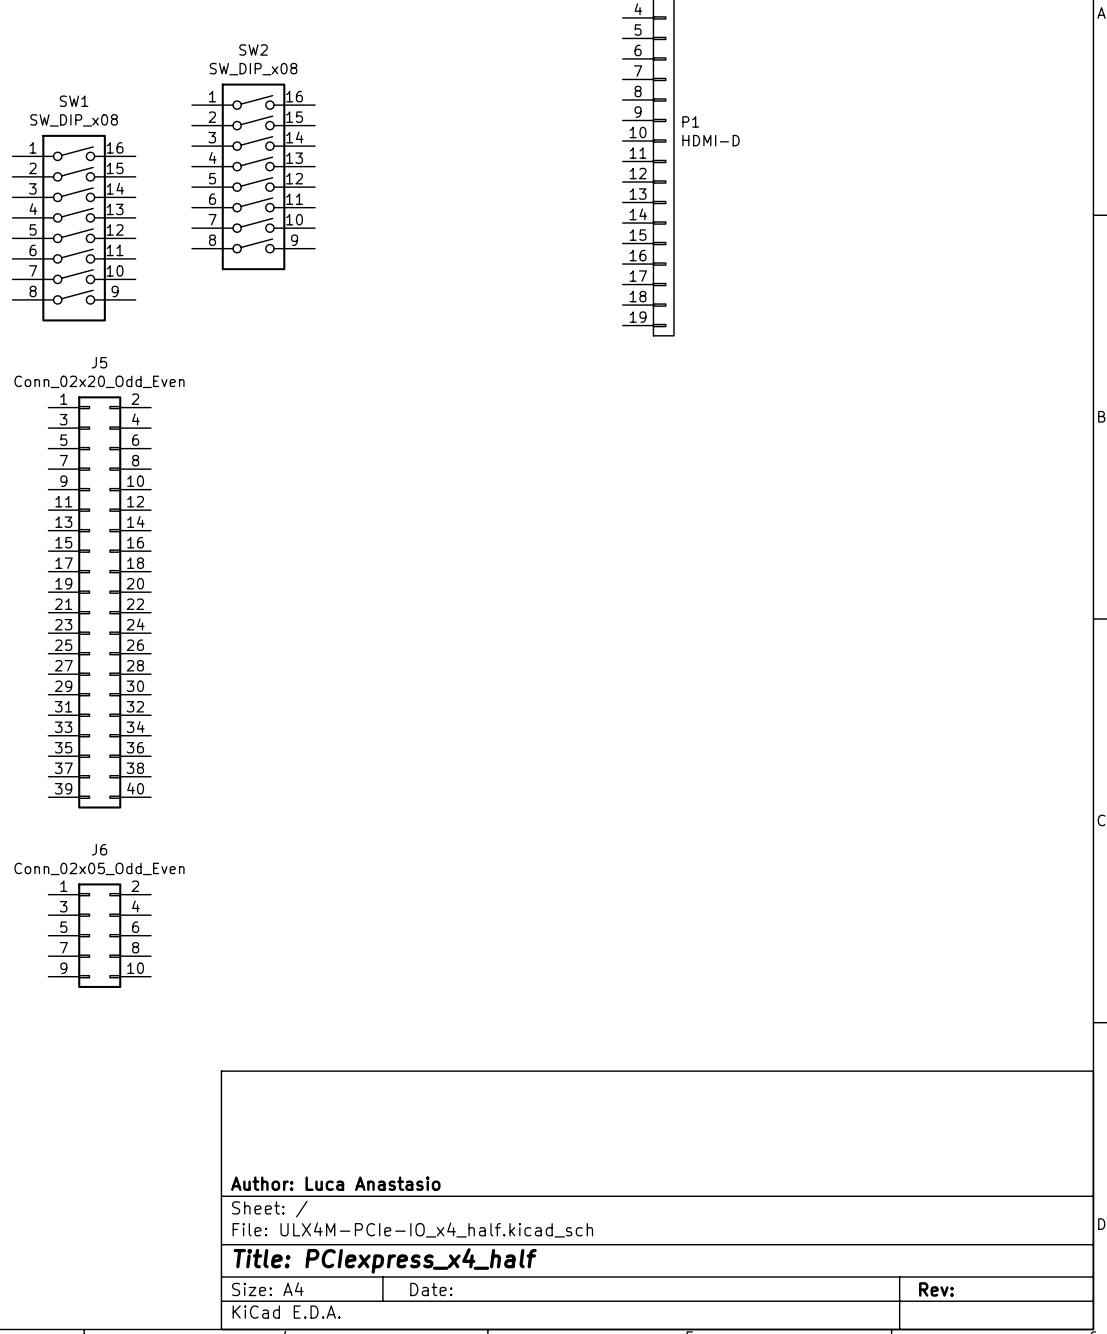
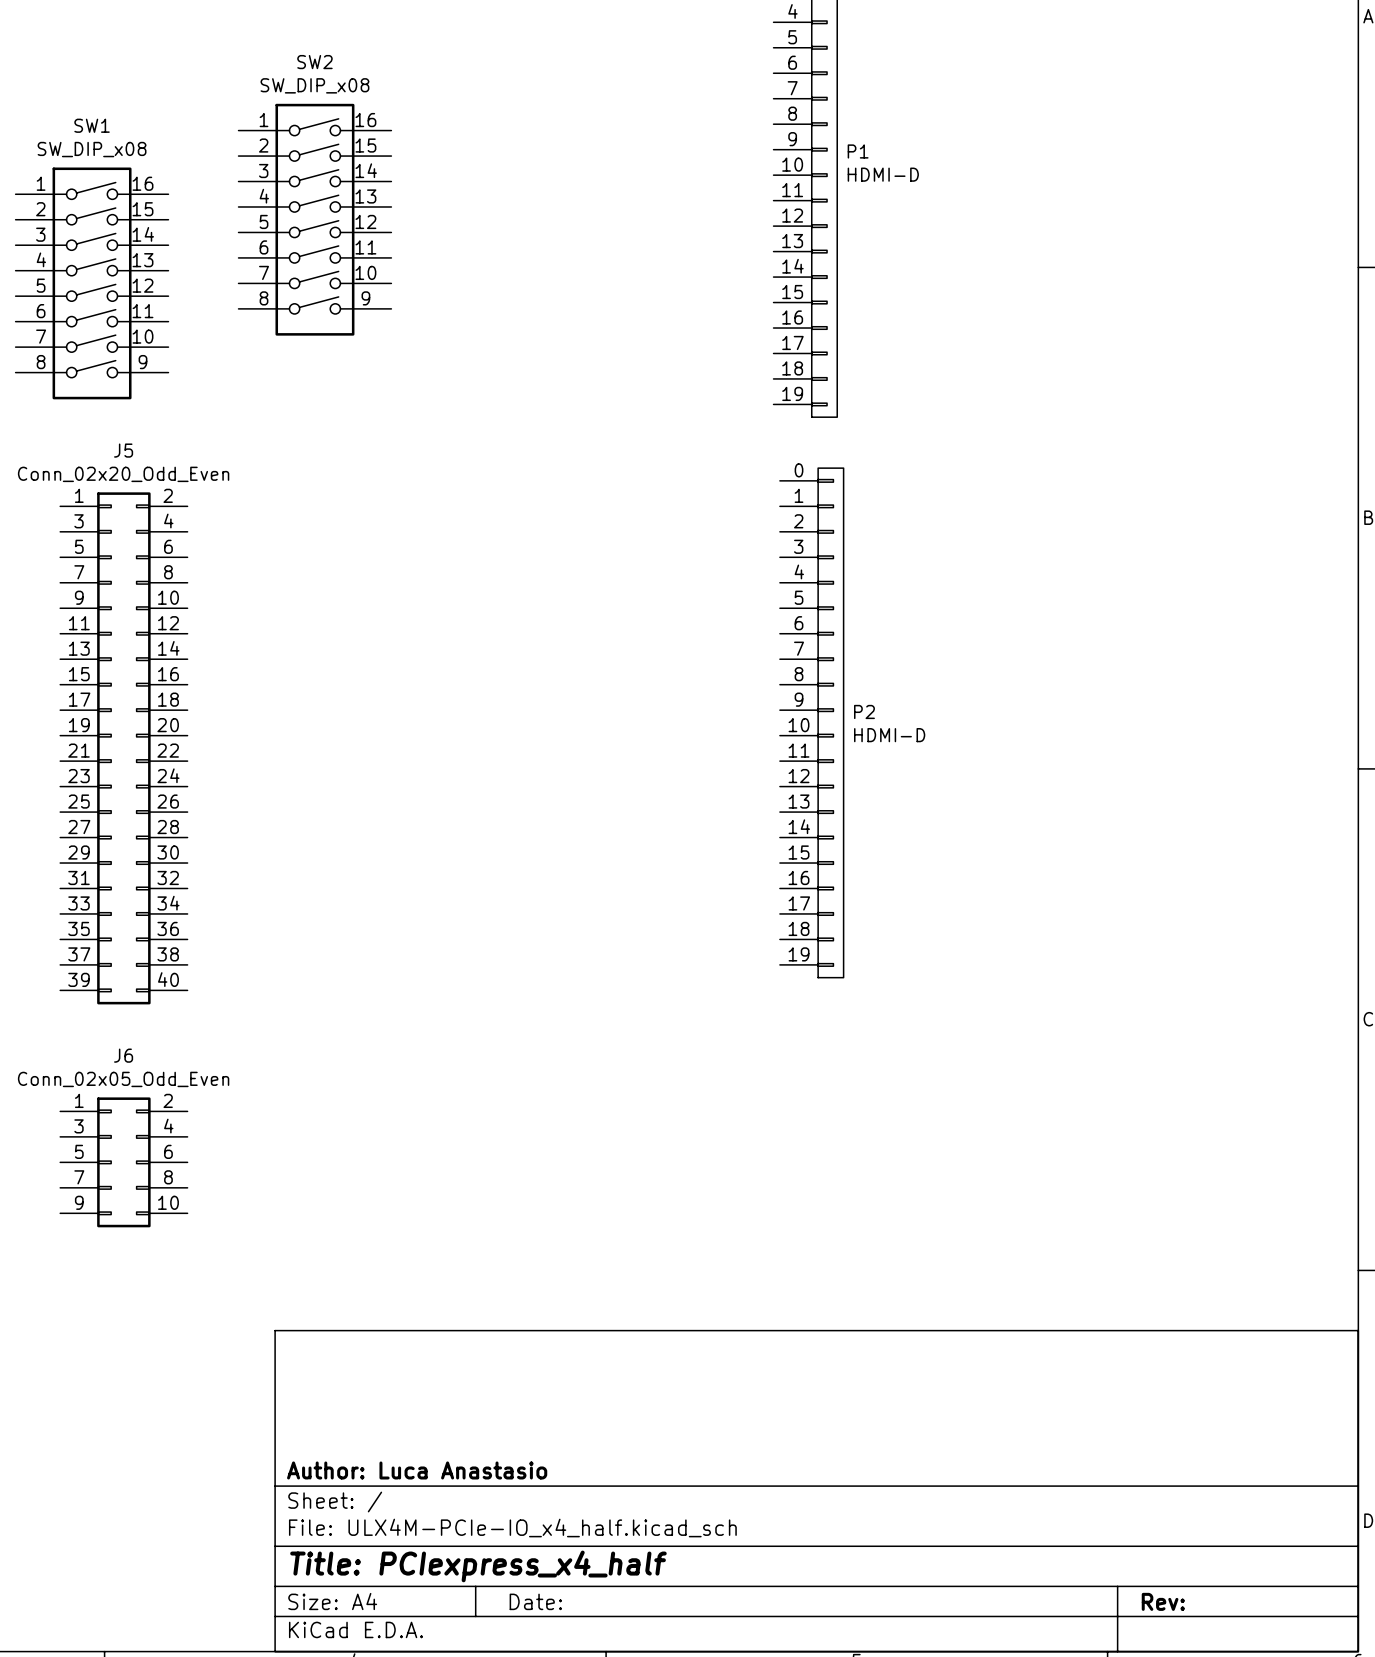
P2: none -> HDMI-D (811, 722)

